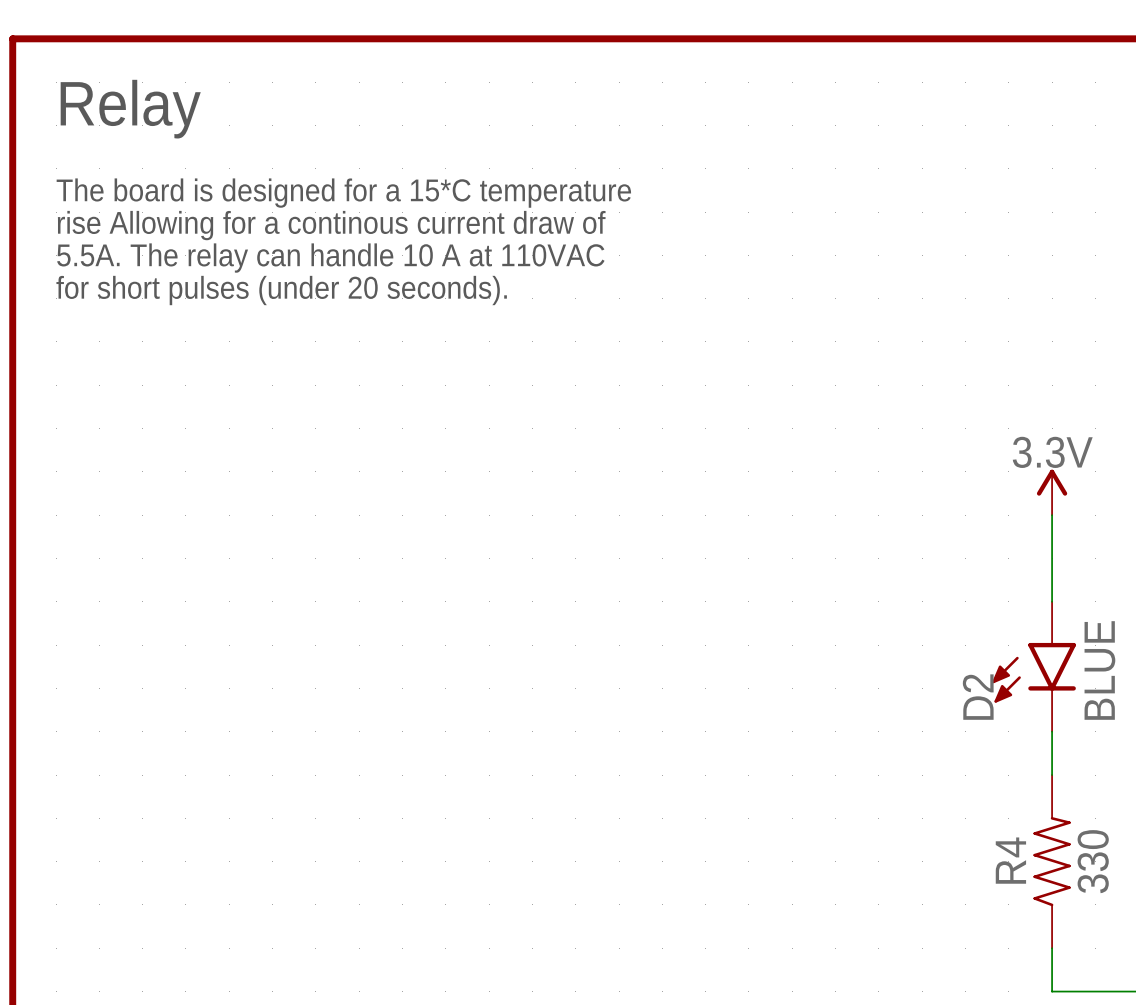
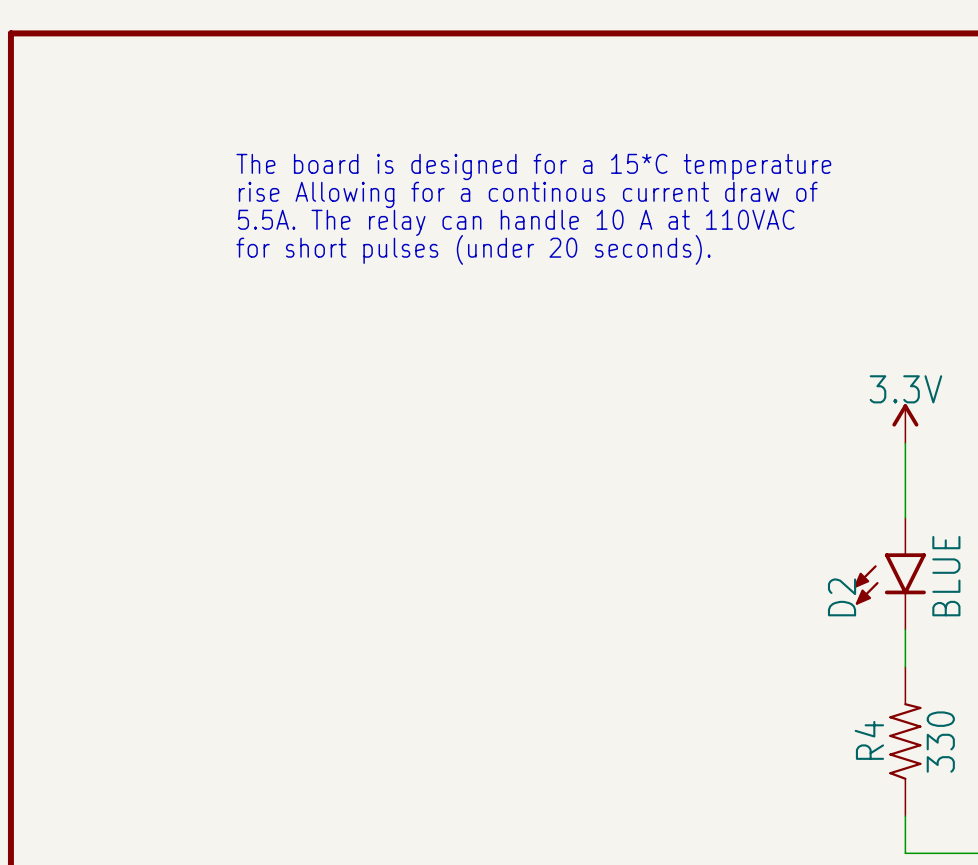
text: Relay (130, 109) -> none
text position: The board is designed for a 15*C temperature (343, 193) -> The board is designed for a 15*C temperature (533, 166)
text position: rise Allowing for a continous current draw of (331, 225) -> rise Allowing for a continous current draw of (528, 194)
text position: 5.5A. The relay can handle 10 A at 110VAC (330, 258) -> 5.5A. The relay can handle 10 A at 110VAC (516, 222)
text position: for short pulses (under 20 seconds). (281, 290) -> for short pulses (under 20 seconds). (473, 249)

